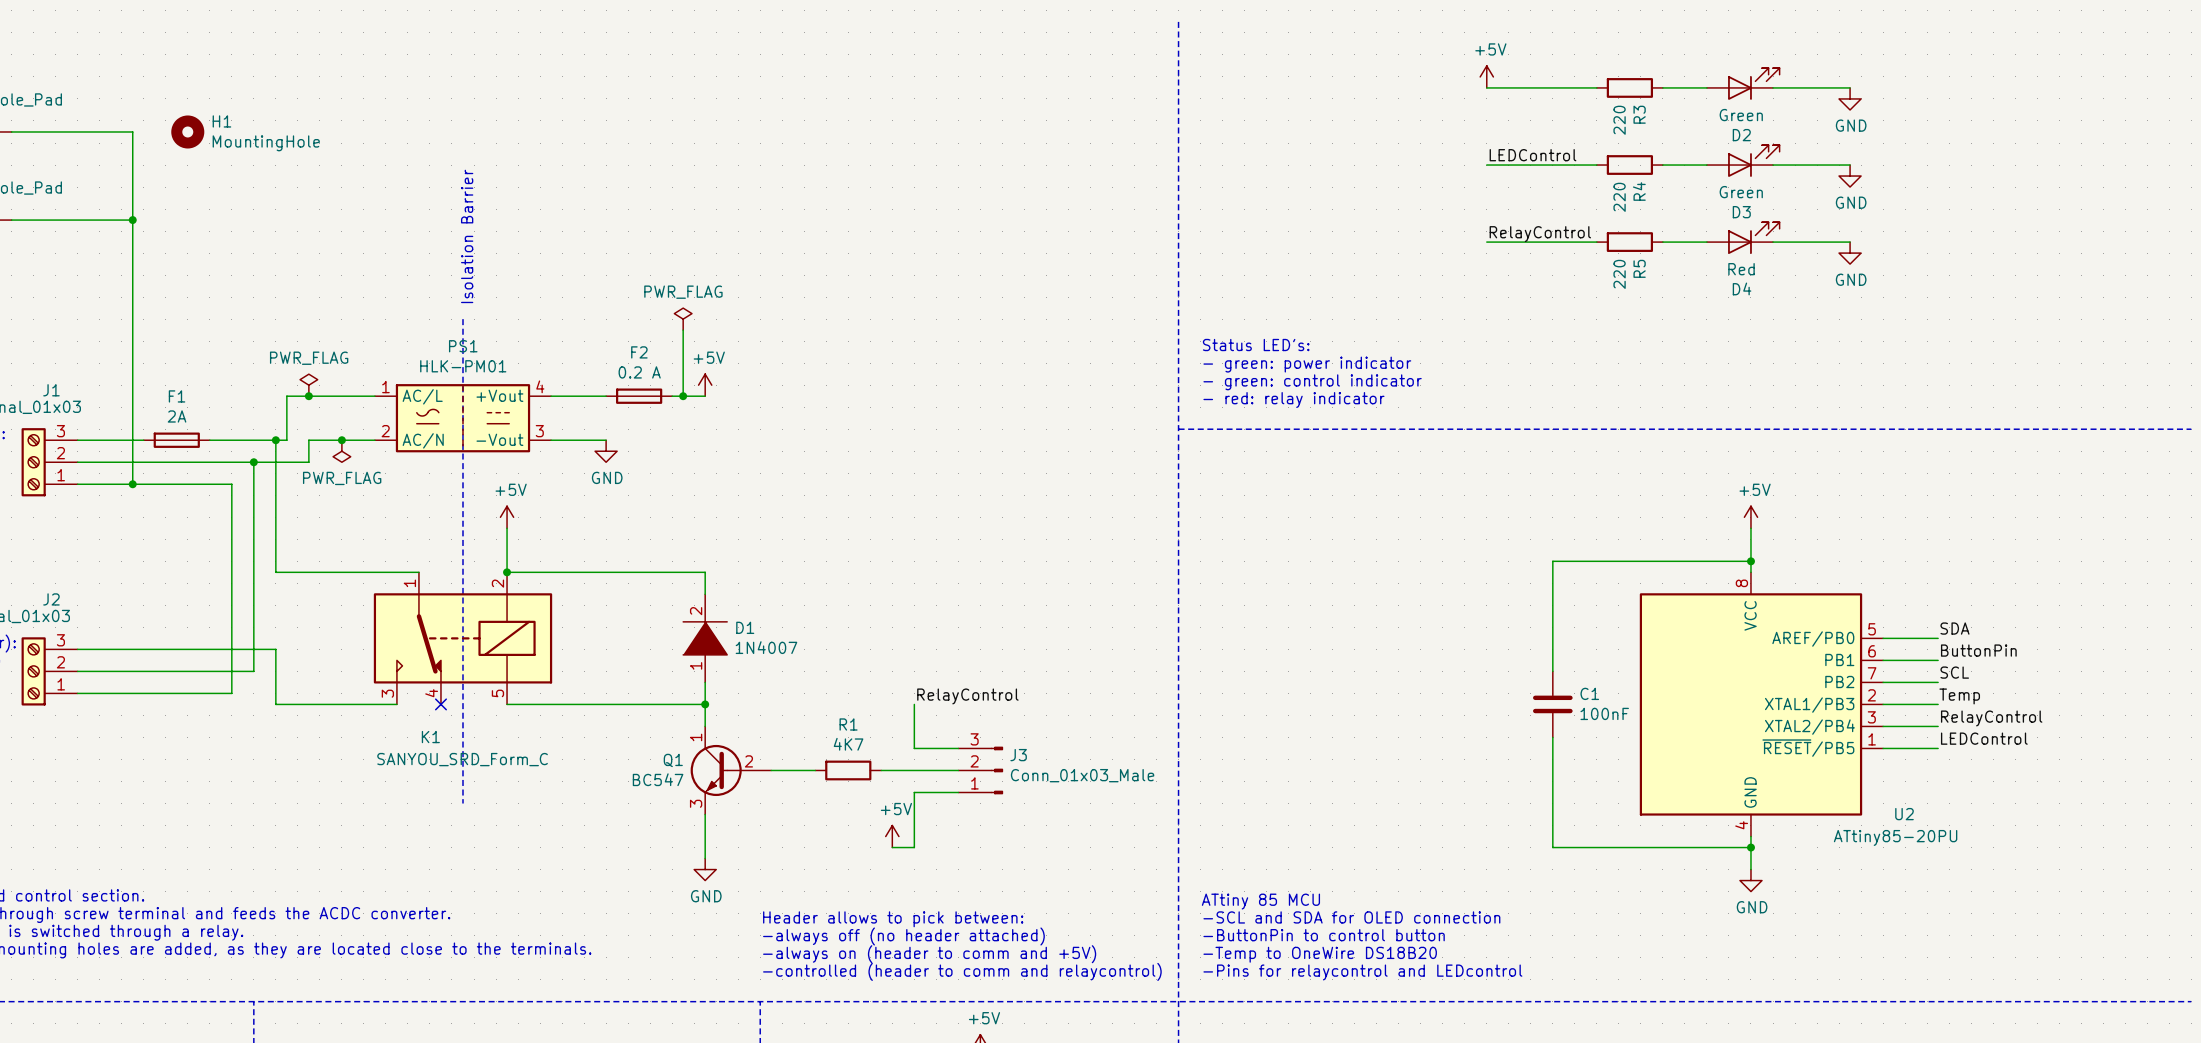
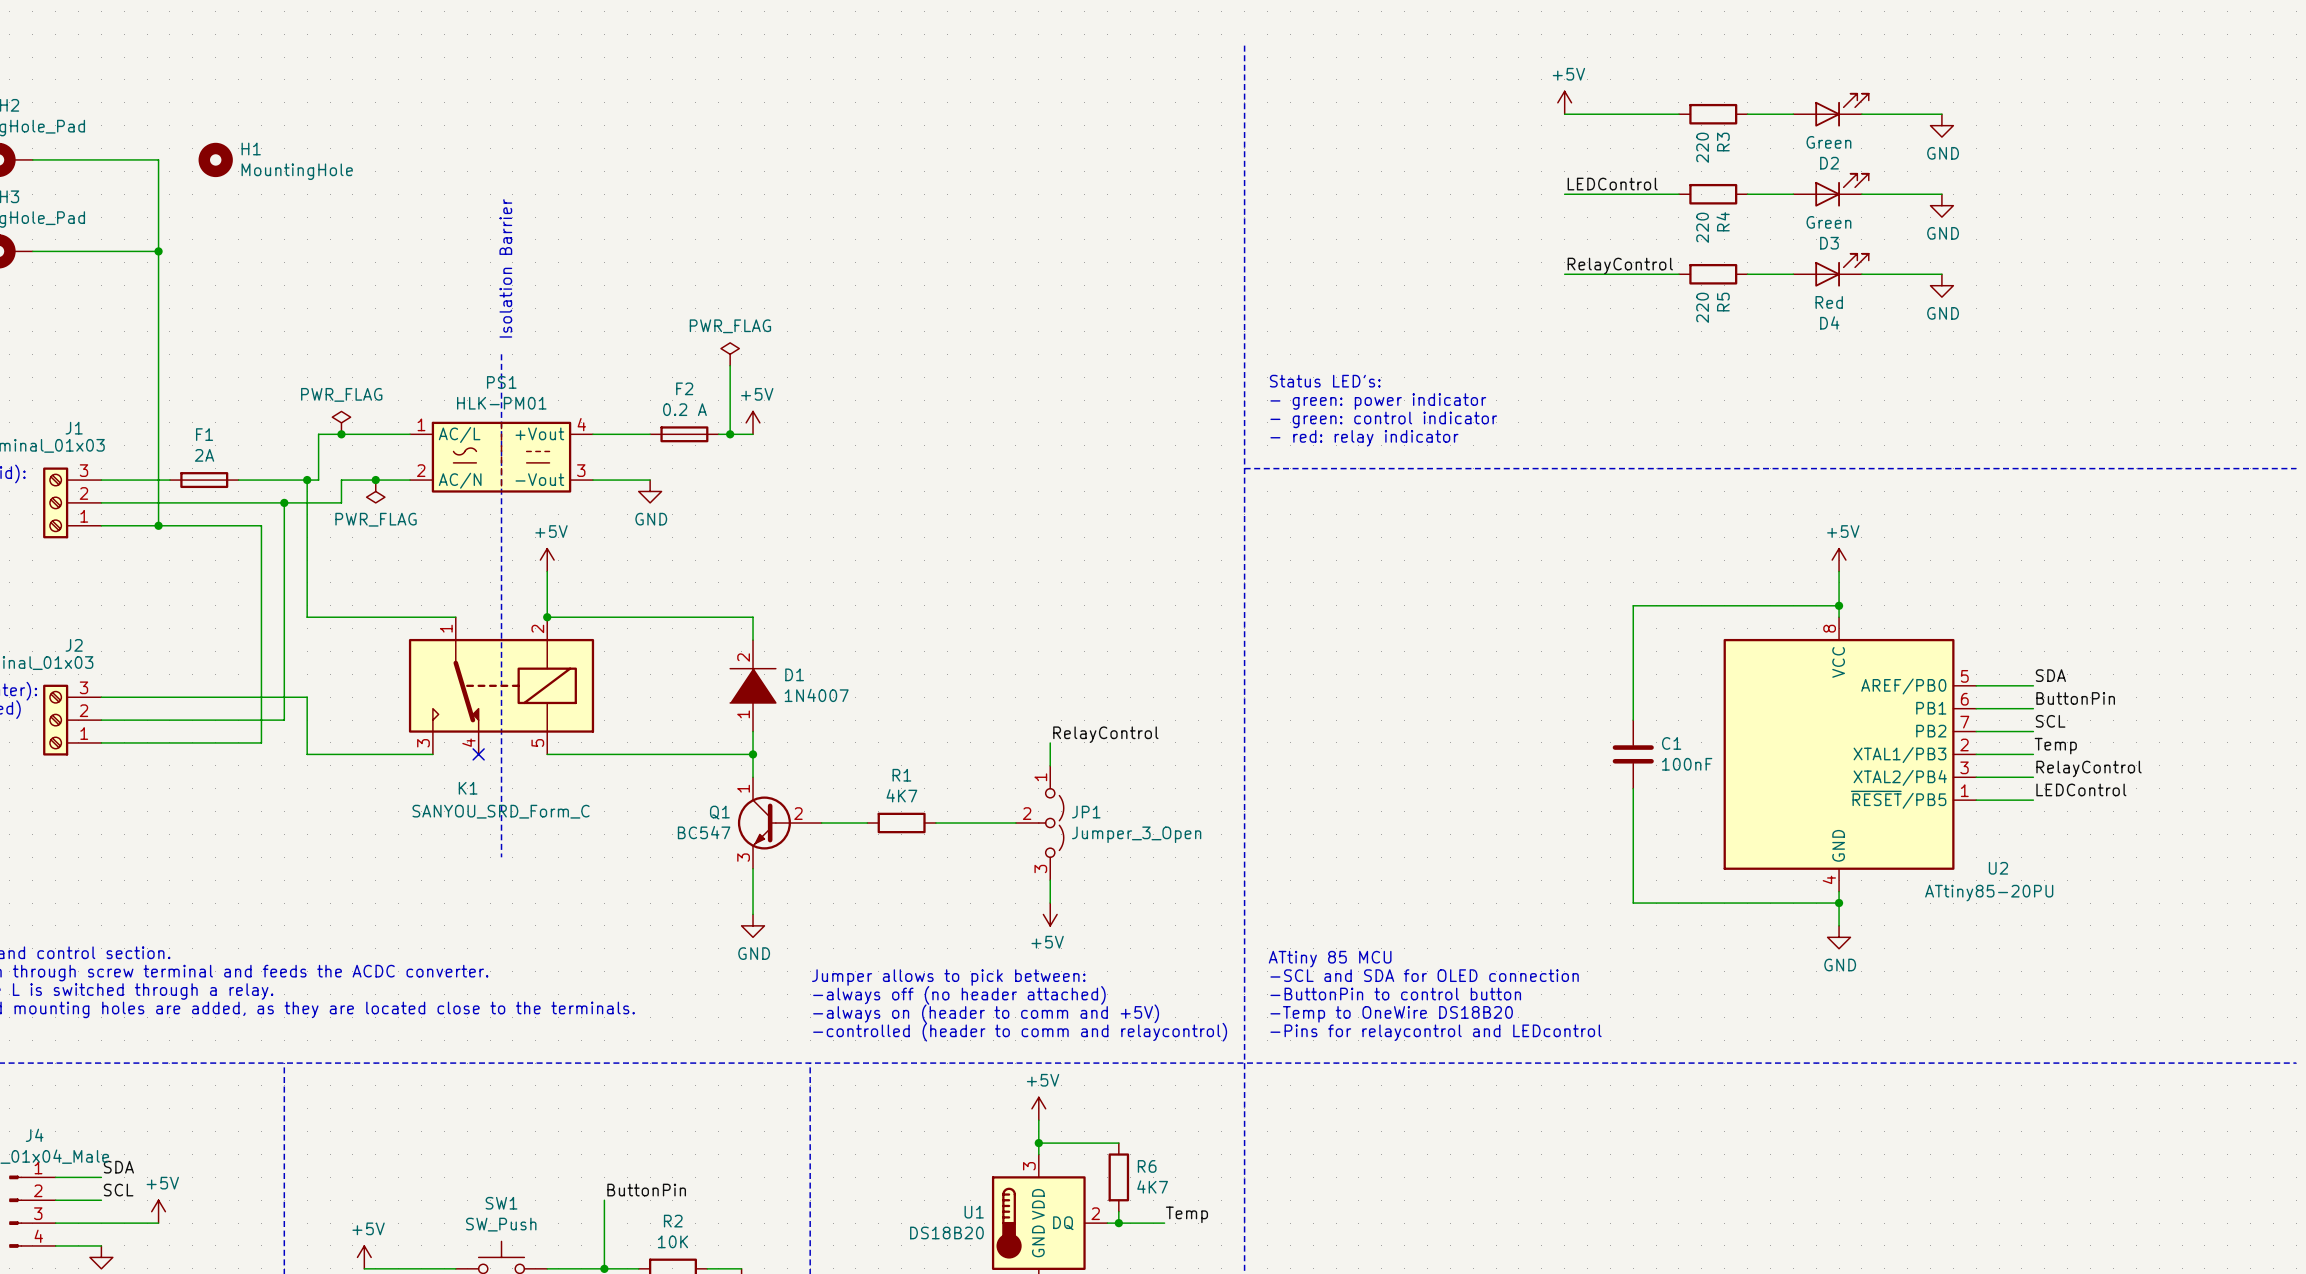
wire: none -> (1050, 742) (1050, 765)
label position: RelayControl (967, 696) -> RelayControl (1105, 734)
wire: (914, 704) (914, 748) (958, 748) -> none
J3: Conn_01x03_Male (980, 770) -> none
JP1: none -> Jumper_3_Open (1039, 823)
wire: (958, 792) (914, 792) (914, 847) (892, 847) -> none
wire: none -> (1050, 880) (1050, 903)
power symbol rotation: 0° (892, 836) -> 180° (1050, 914)
power symbol position: +5V (892, 836) -> +5V (1050, 914)
text: Header allows to pick between: (893, 919) -> Jumper allows to pick between: (948, 977)

